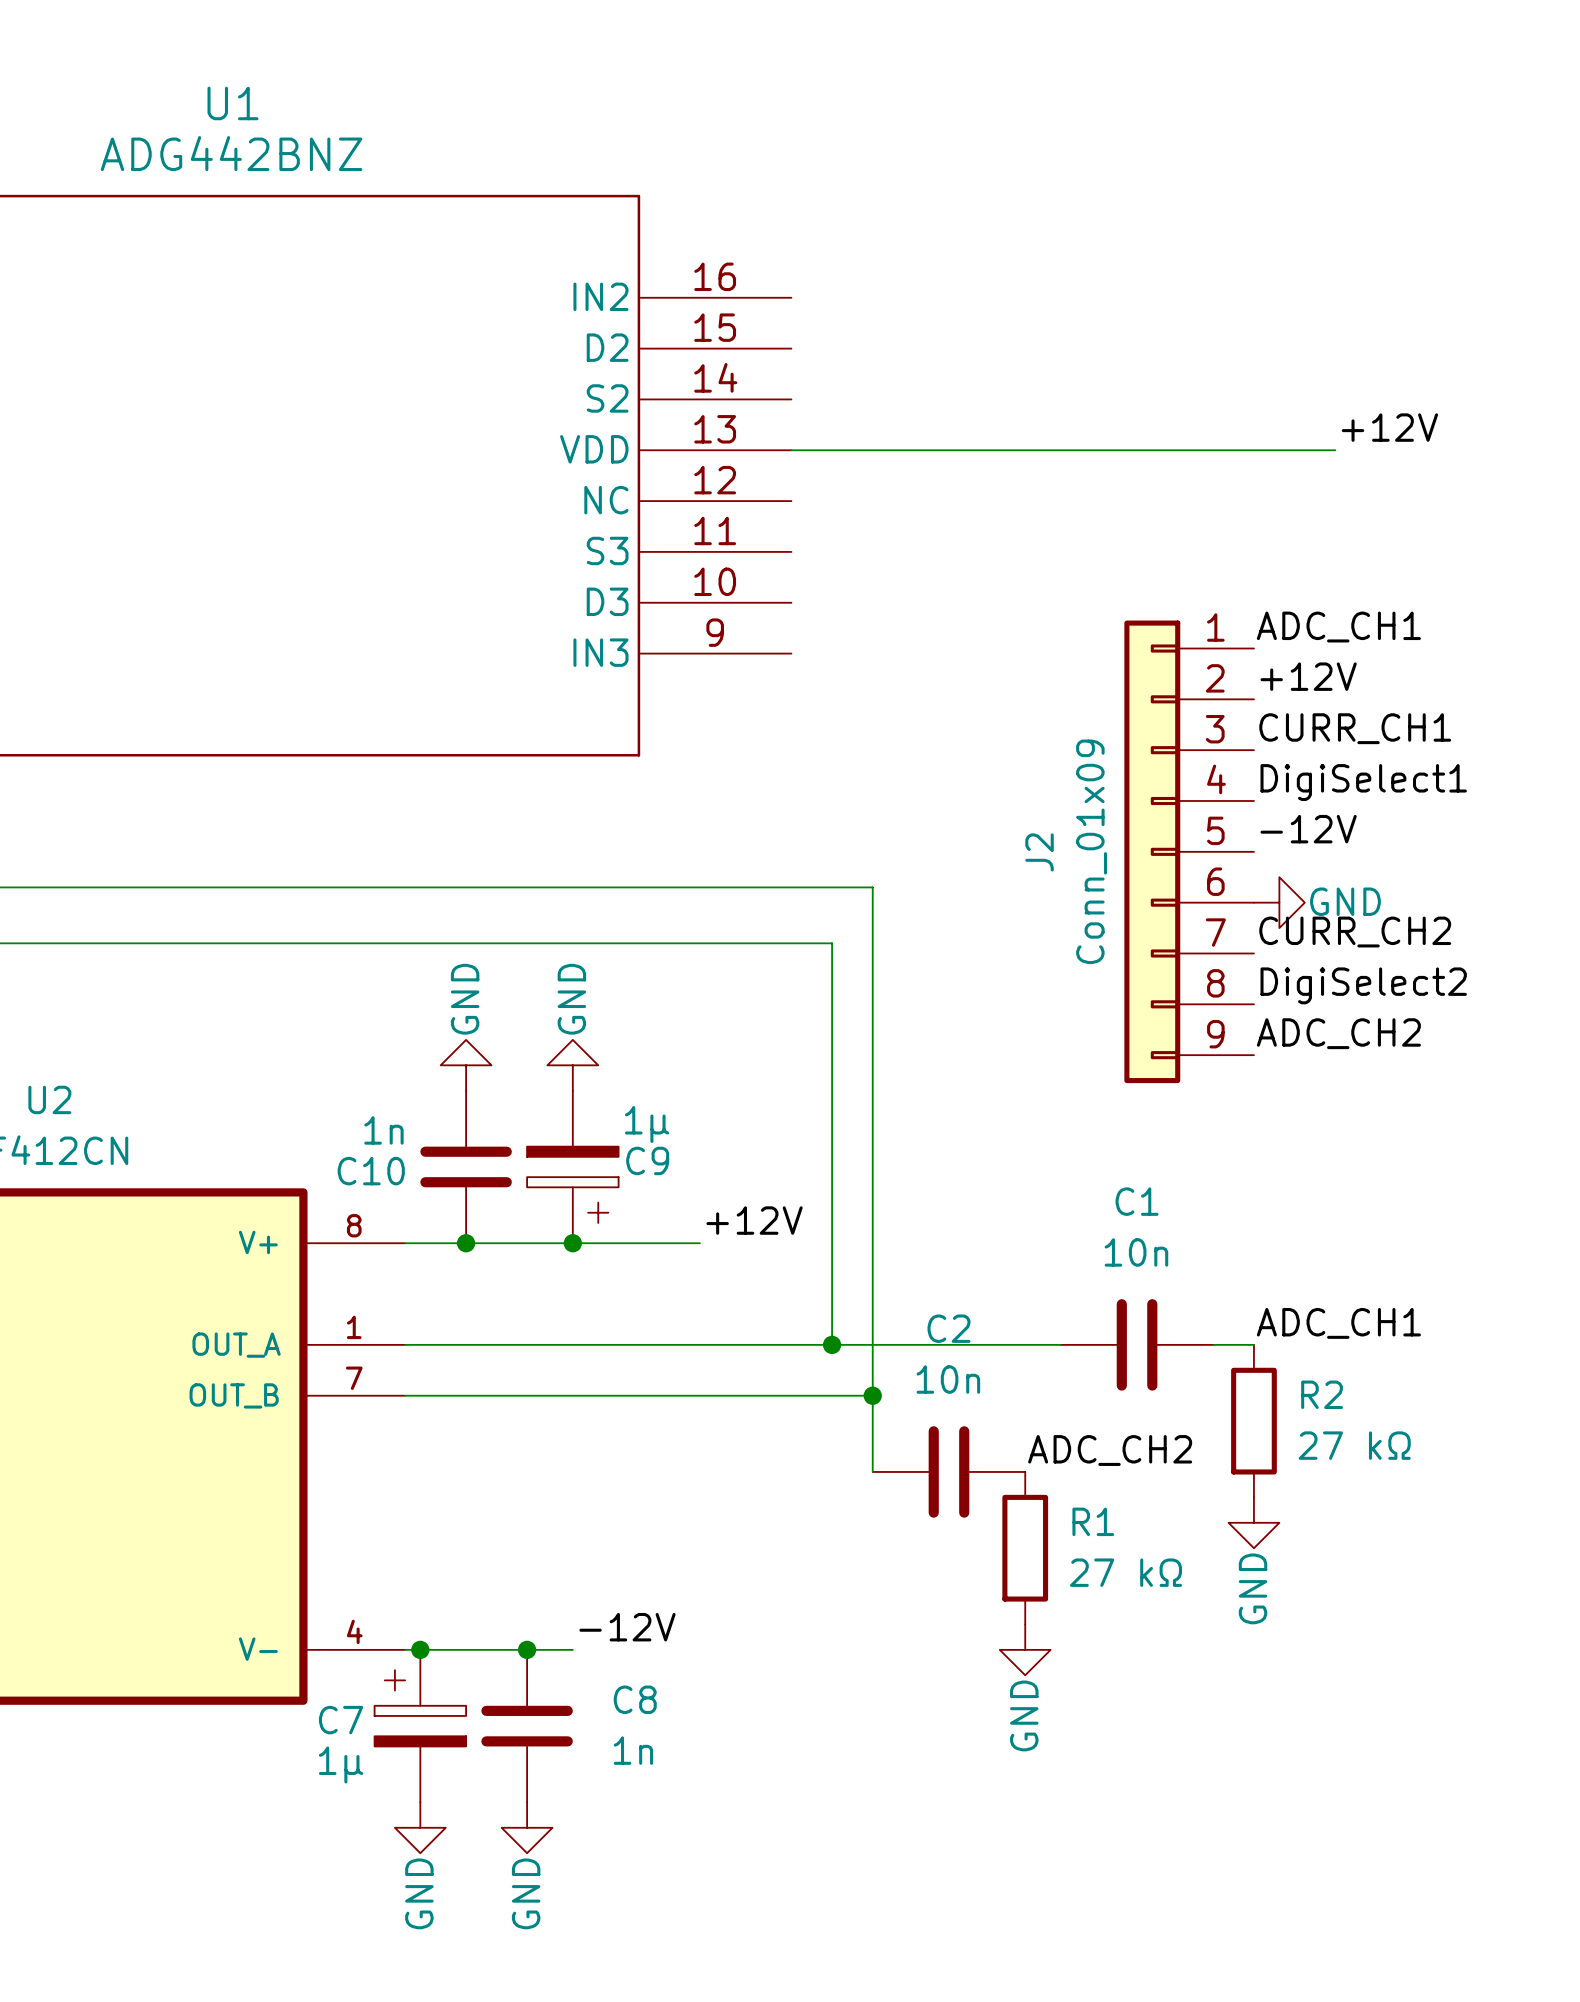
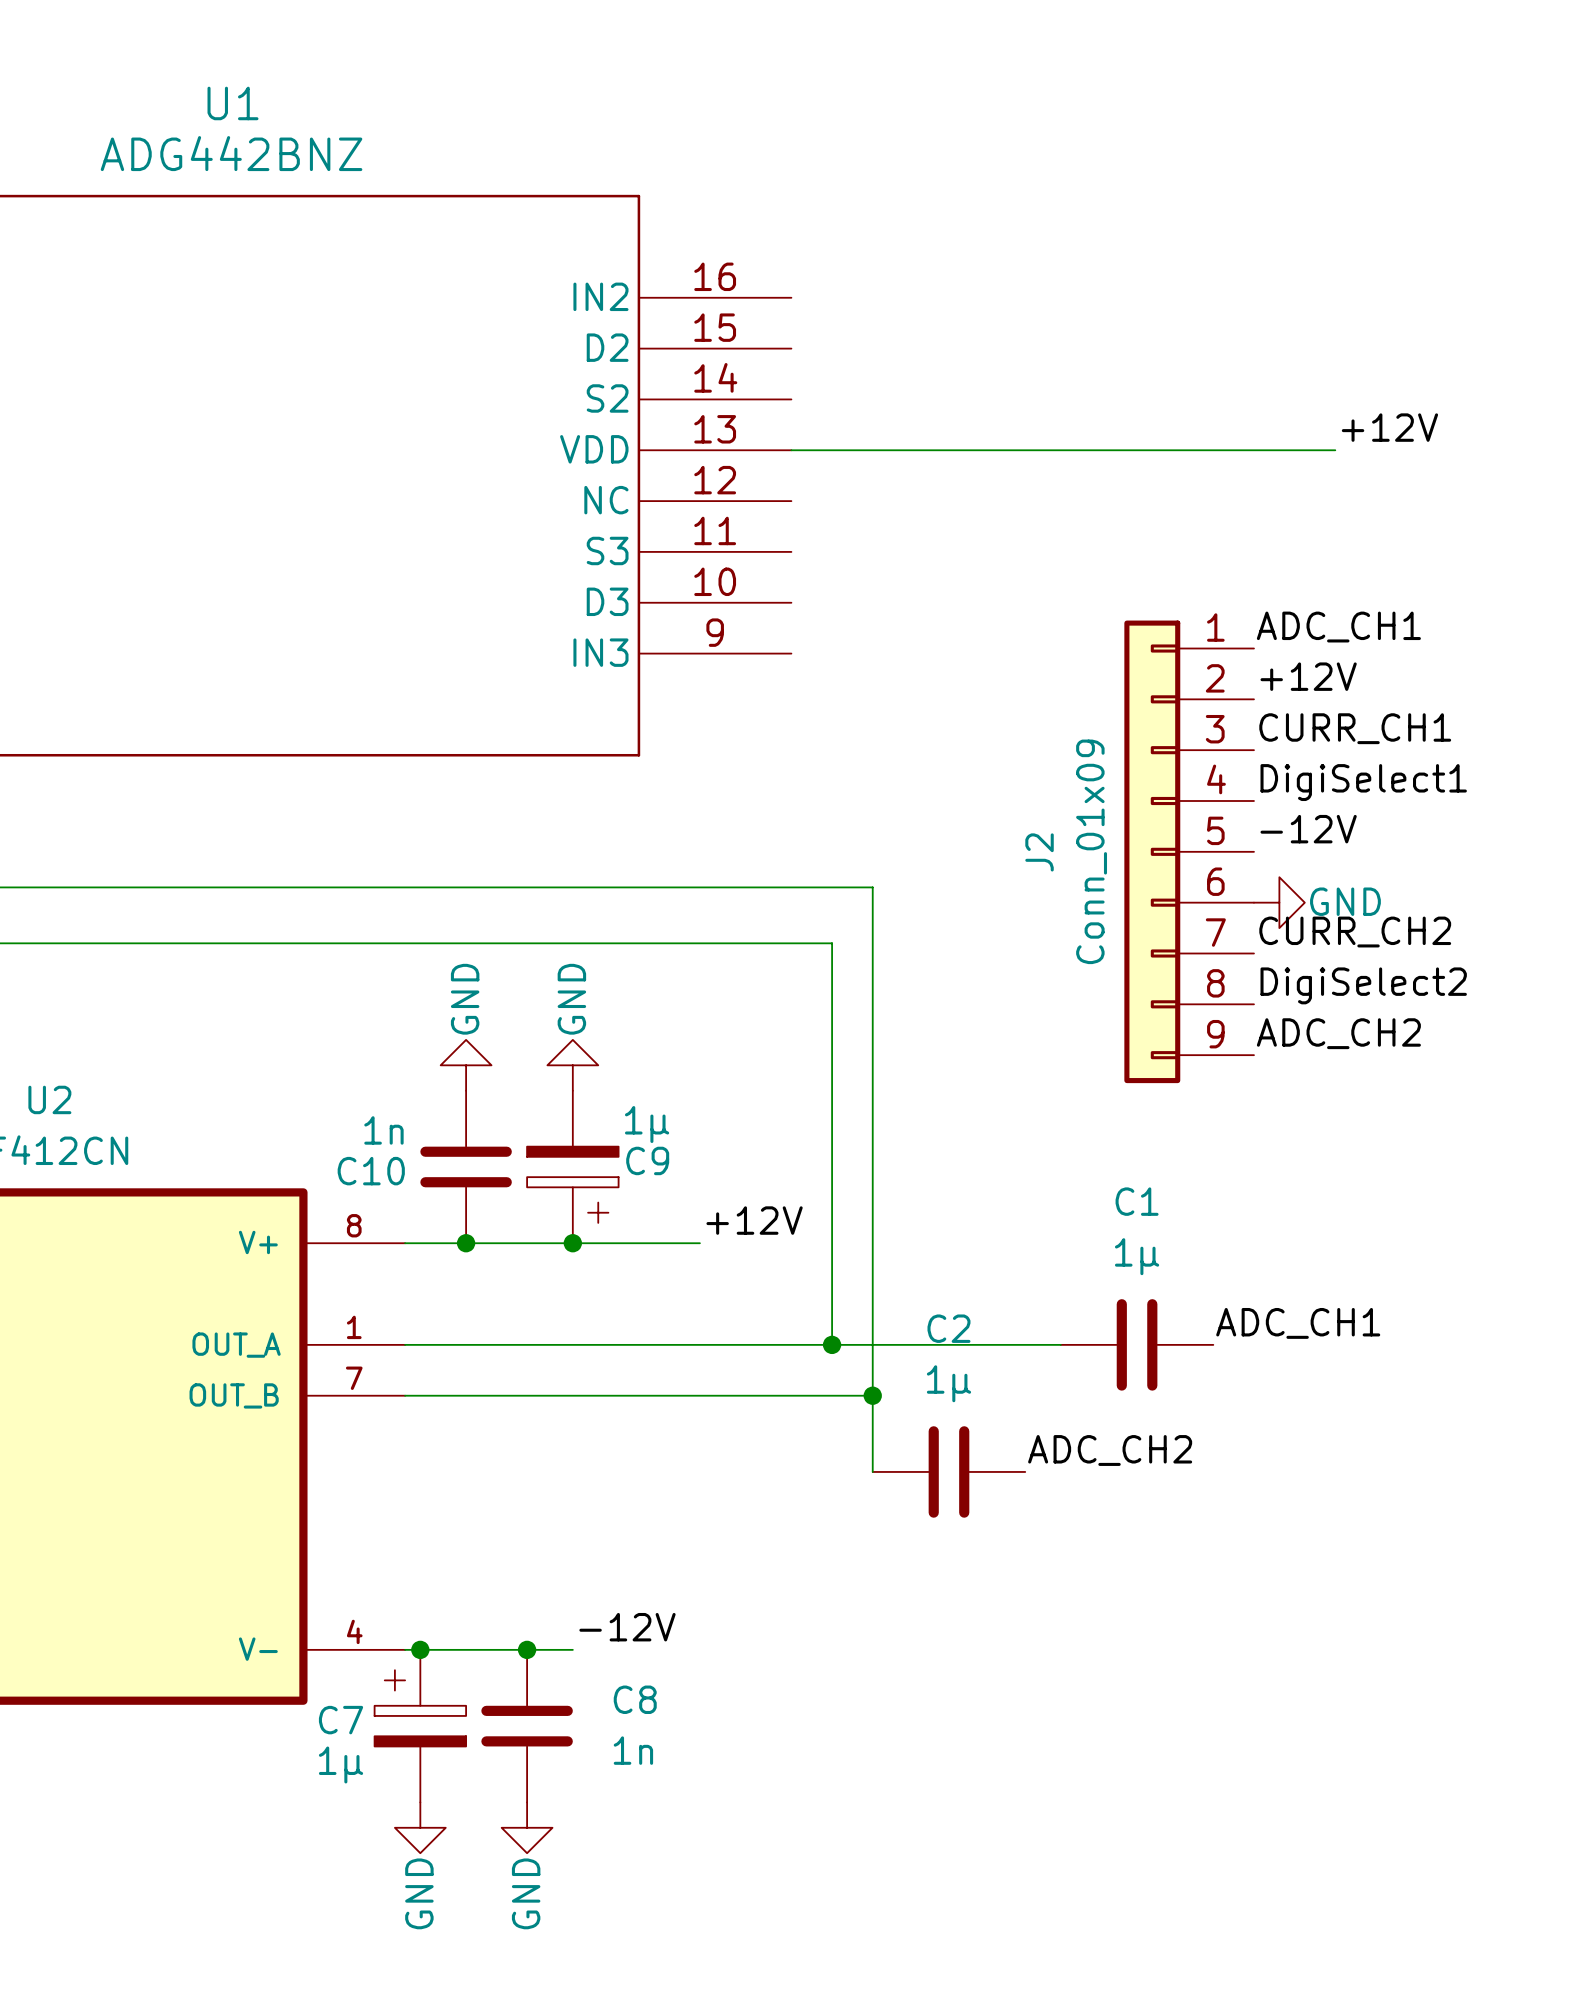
C1 value: 10n (1136, 1252) -> 1µ (1137, 1256)
label position: ADC_CH1 (1338, 1323) -> ADC_CH1 (1298, 1323)
wire: (1213, 1344) (1253, 1344) -> none
C2 value: 10n (948, 1379) -> 1µ (948, 1383)
R2: 27 kΩ (1253, 1421) -> none
power symbol: GND (1253, 1522) -> none
R1: 27 kΩ (1025, 1548) -> none
power symbol: GND (1025, 1649) -> none

